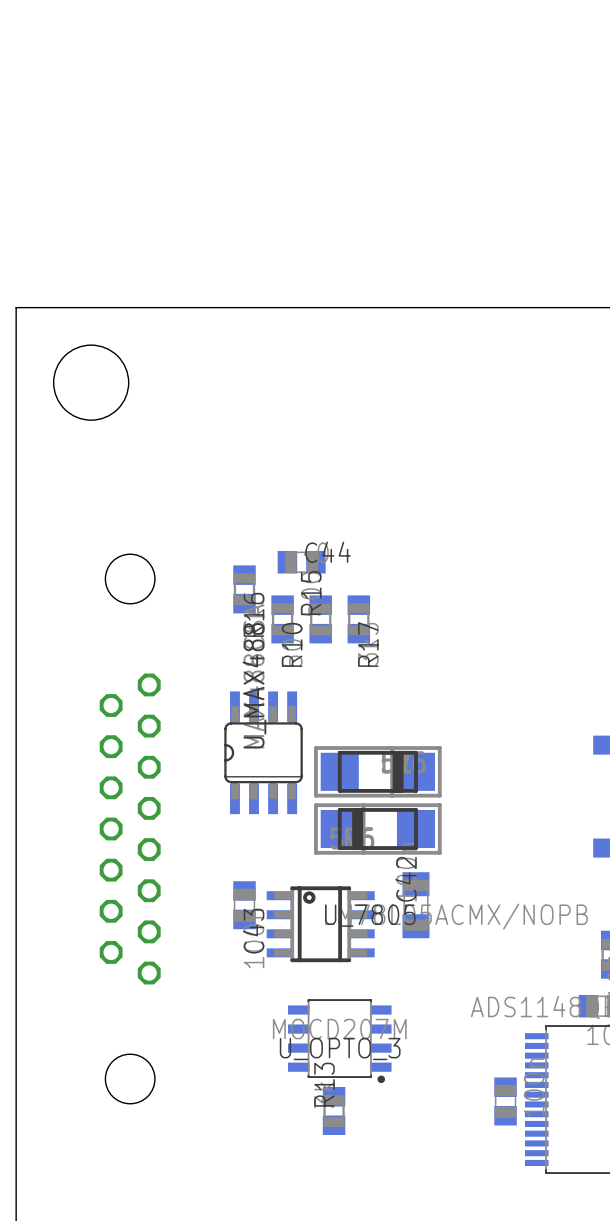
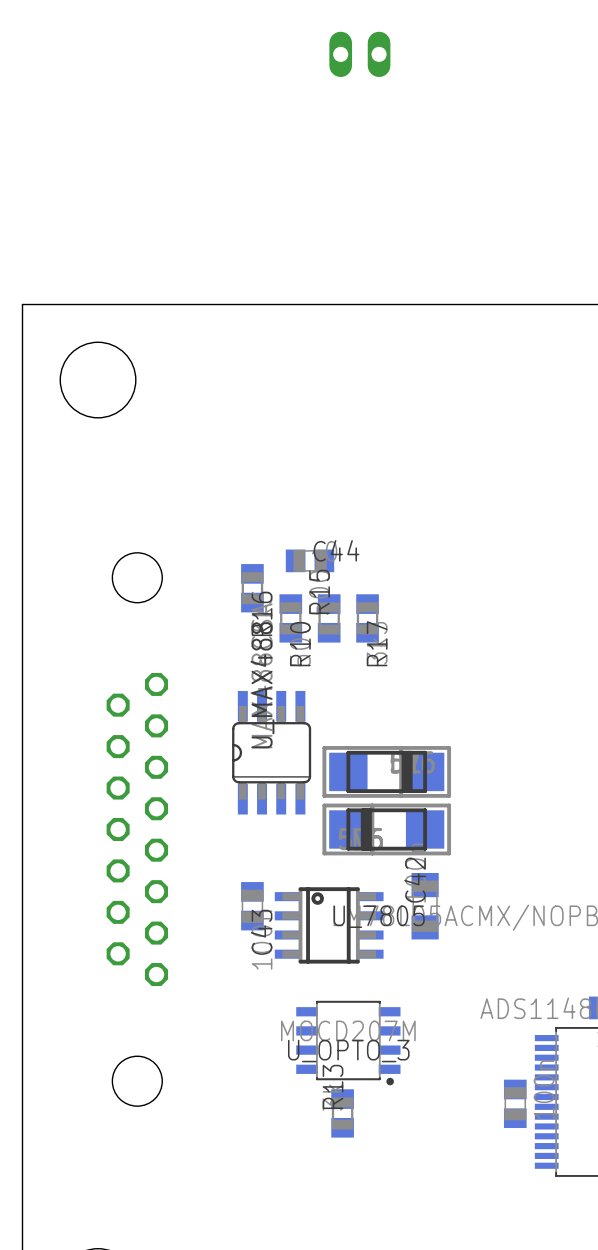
part: none -> (359, 54)

